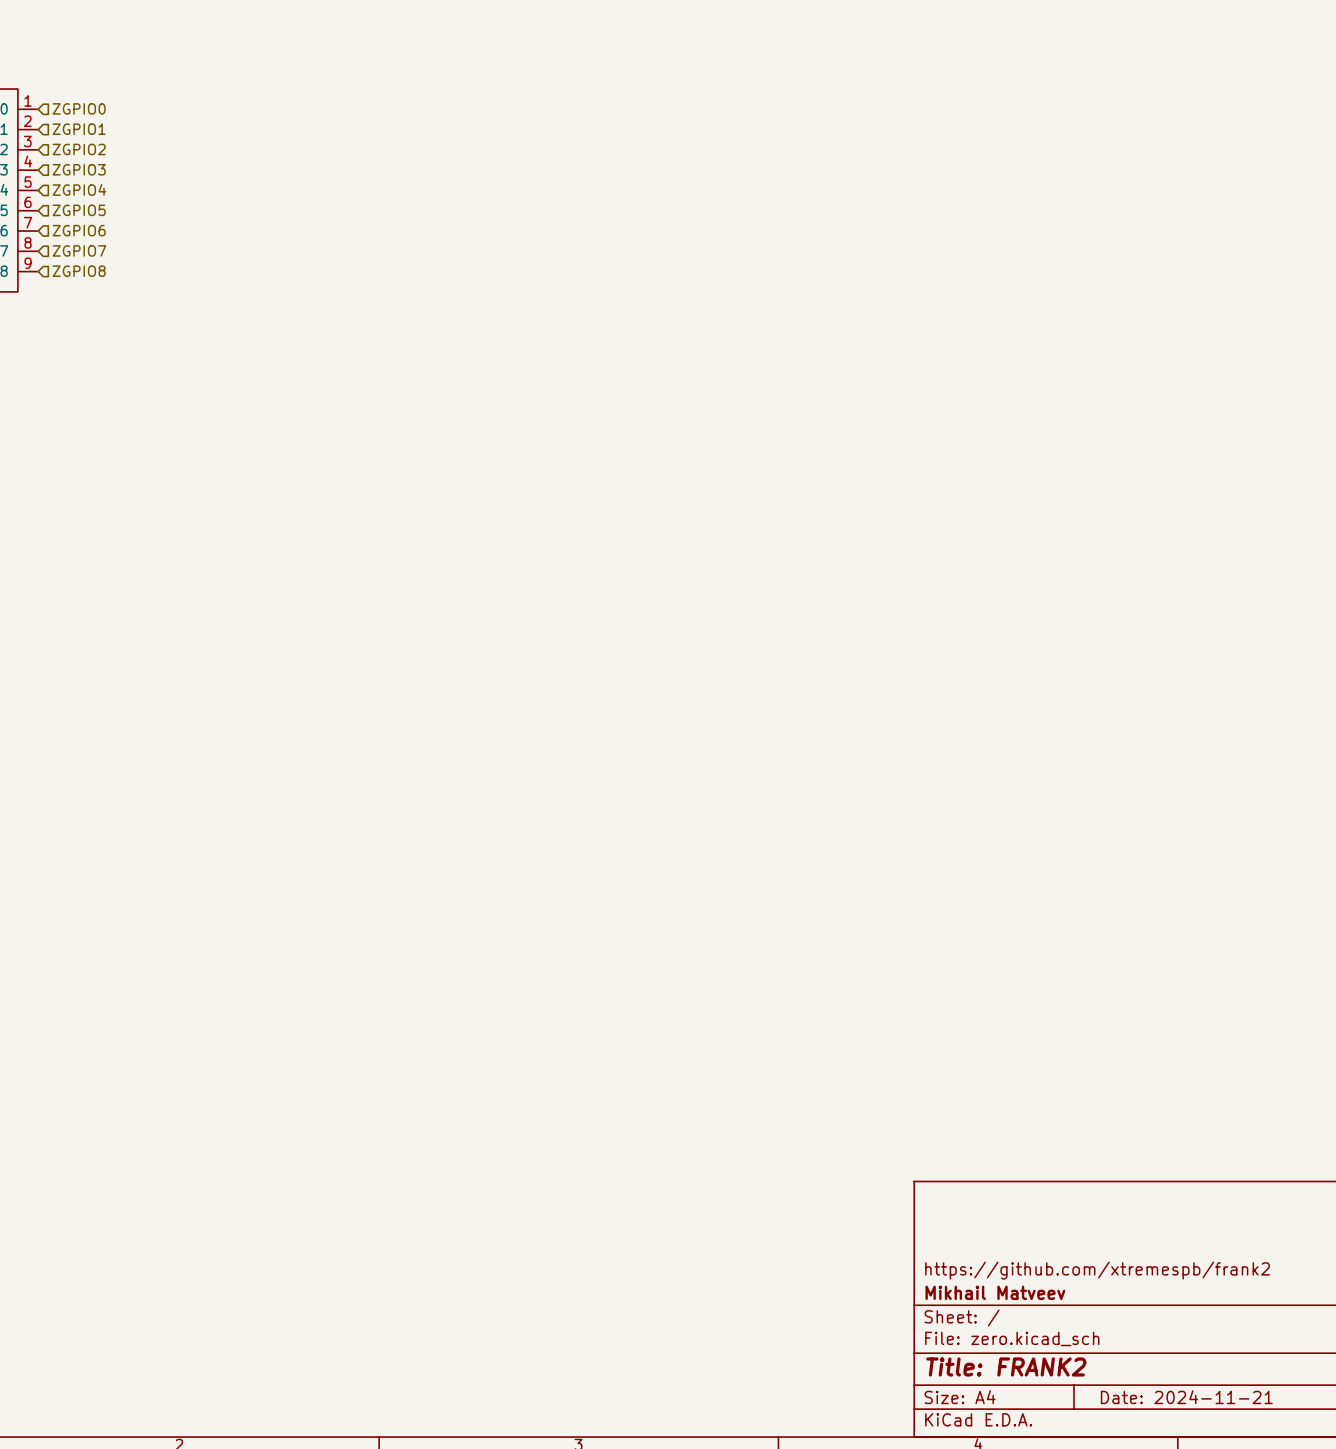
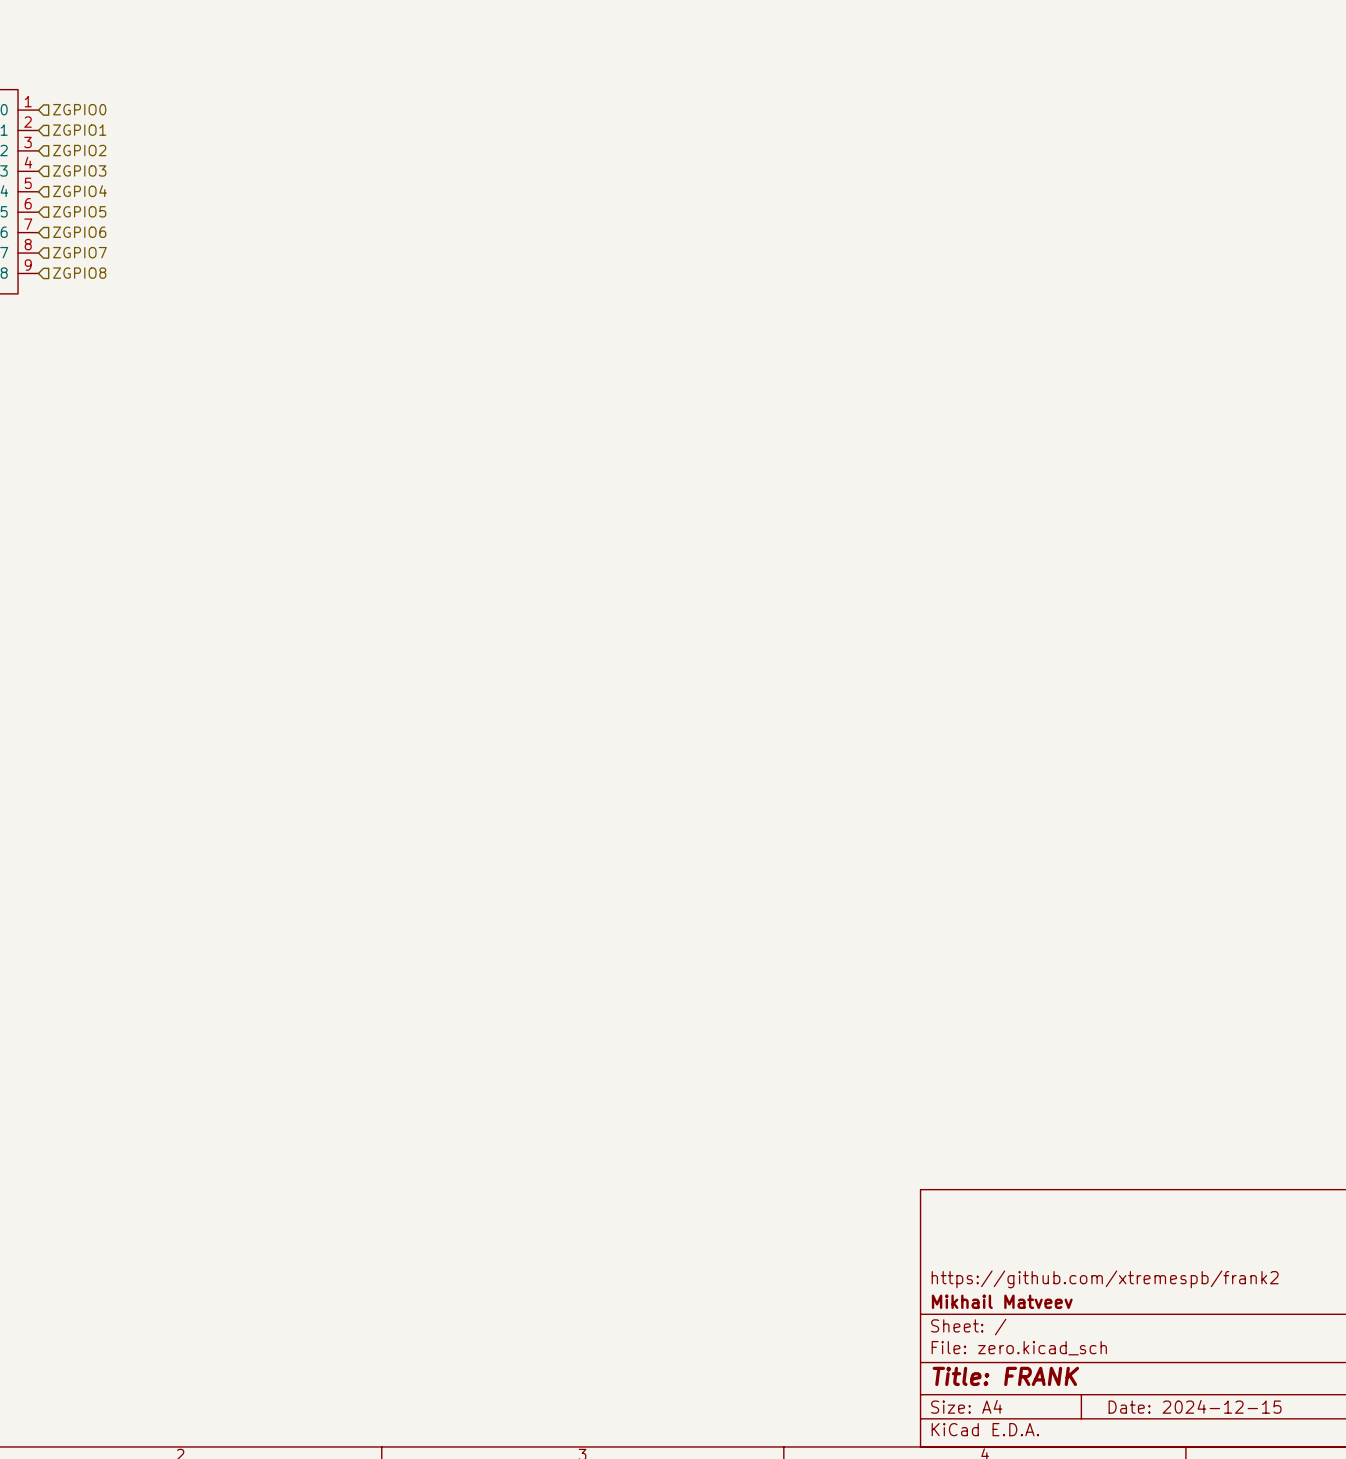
title block: Title: FRANK2 (1006, 1366) -> Title: FRANK (1005, 1376)
title block: Date: 2024-11-21 (1186, 1397) -> Date: 2024-12-15 (1195, 1406)

